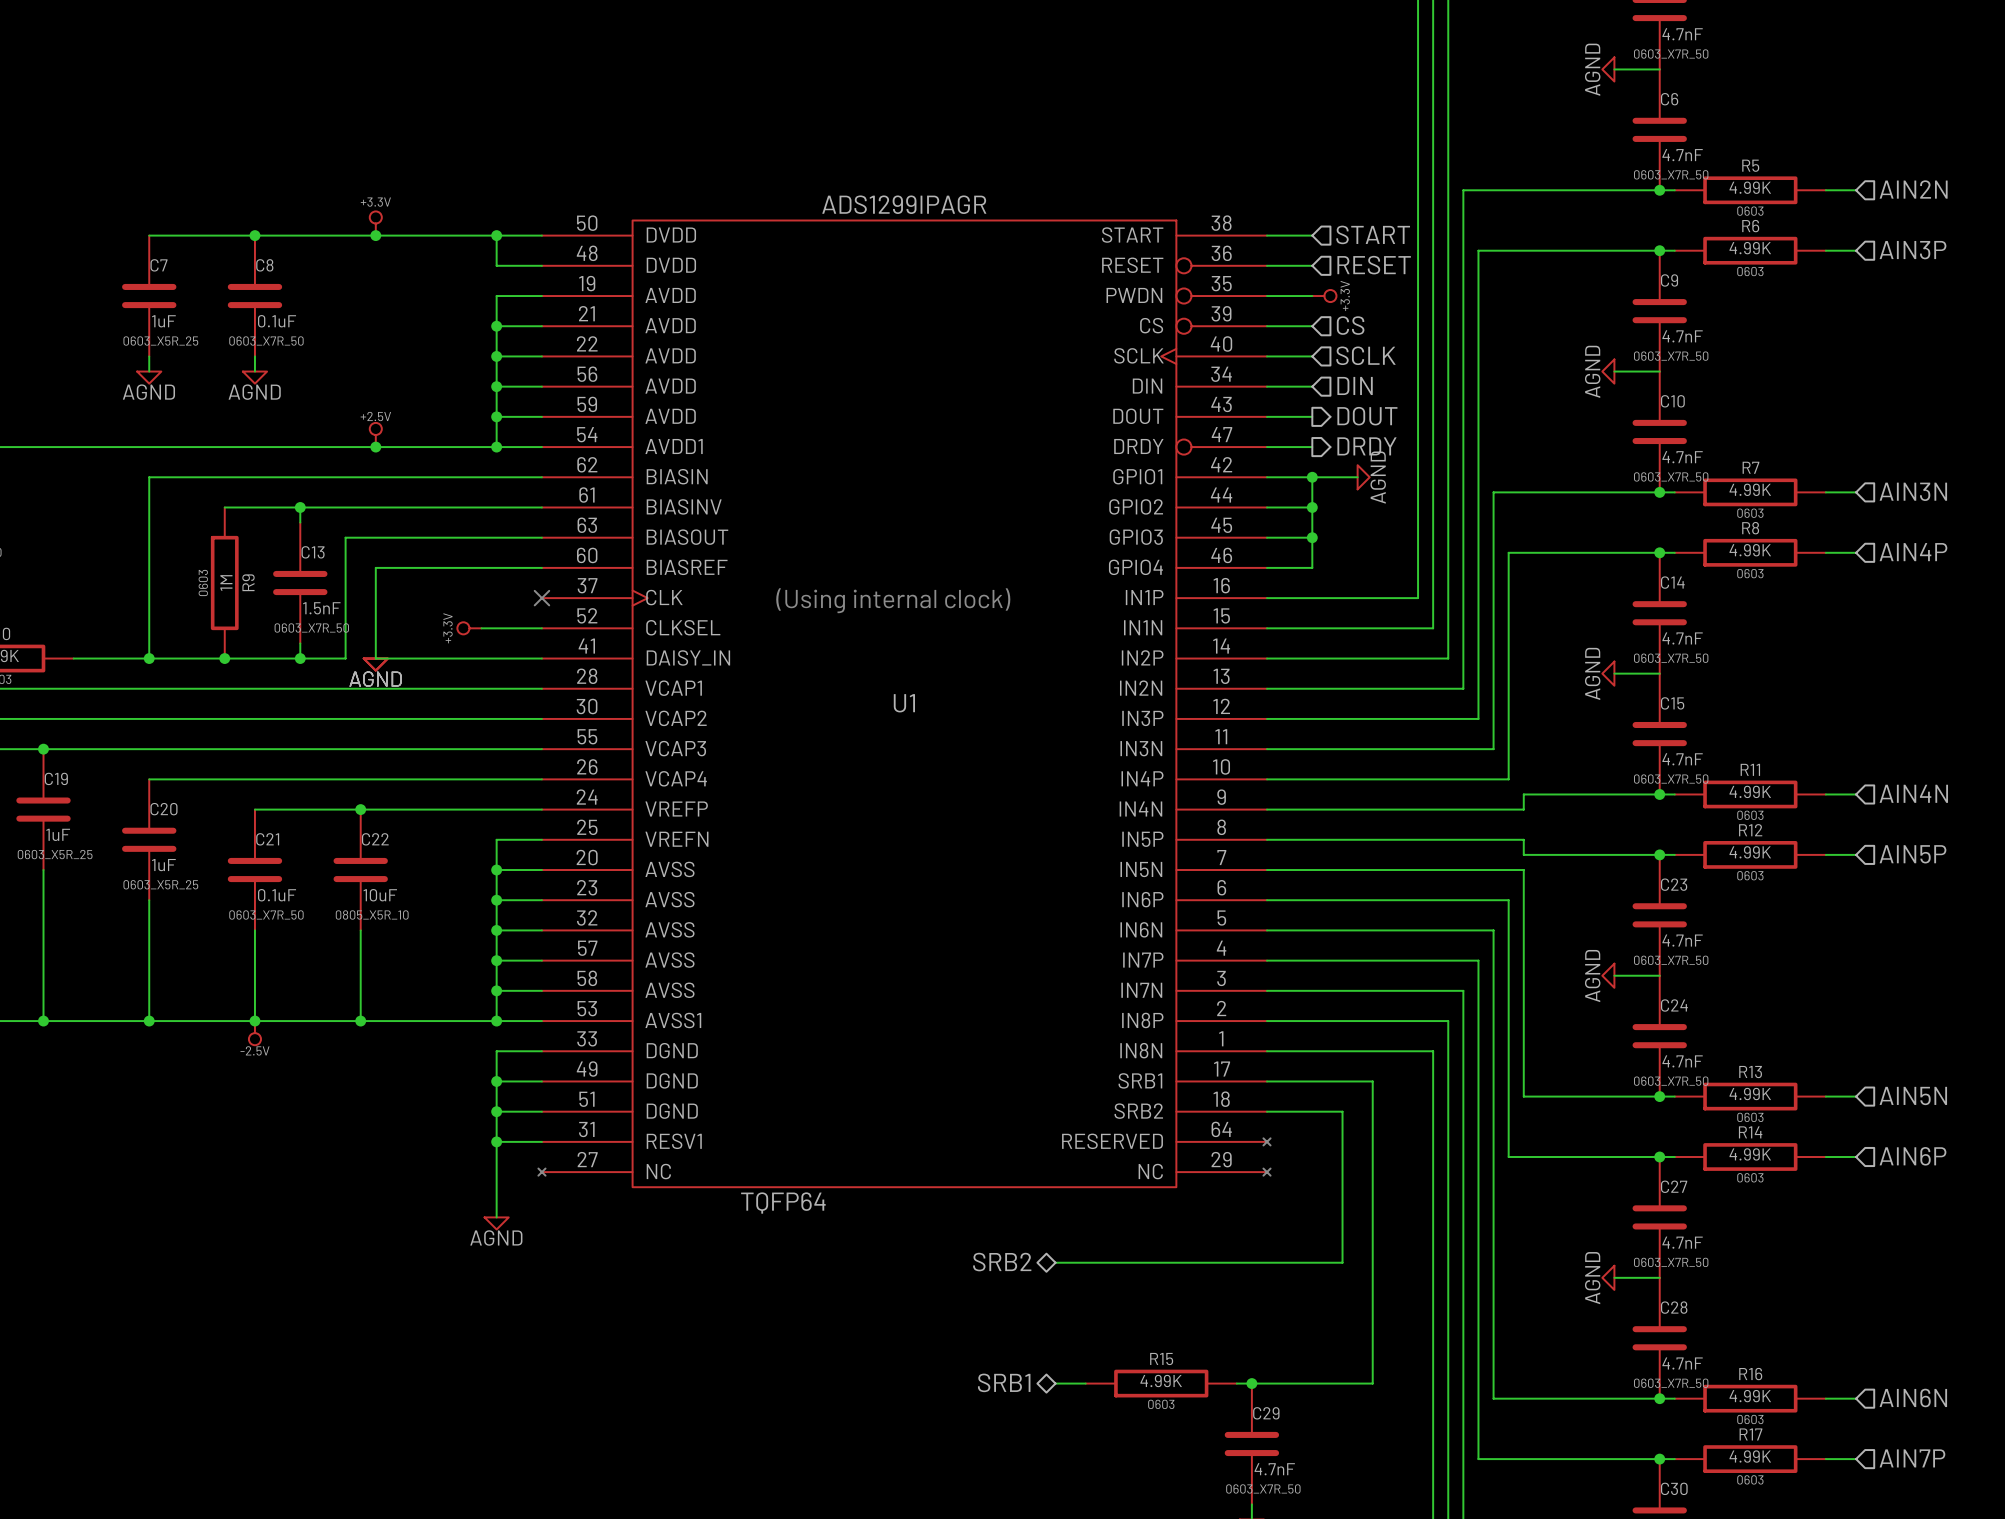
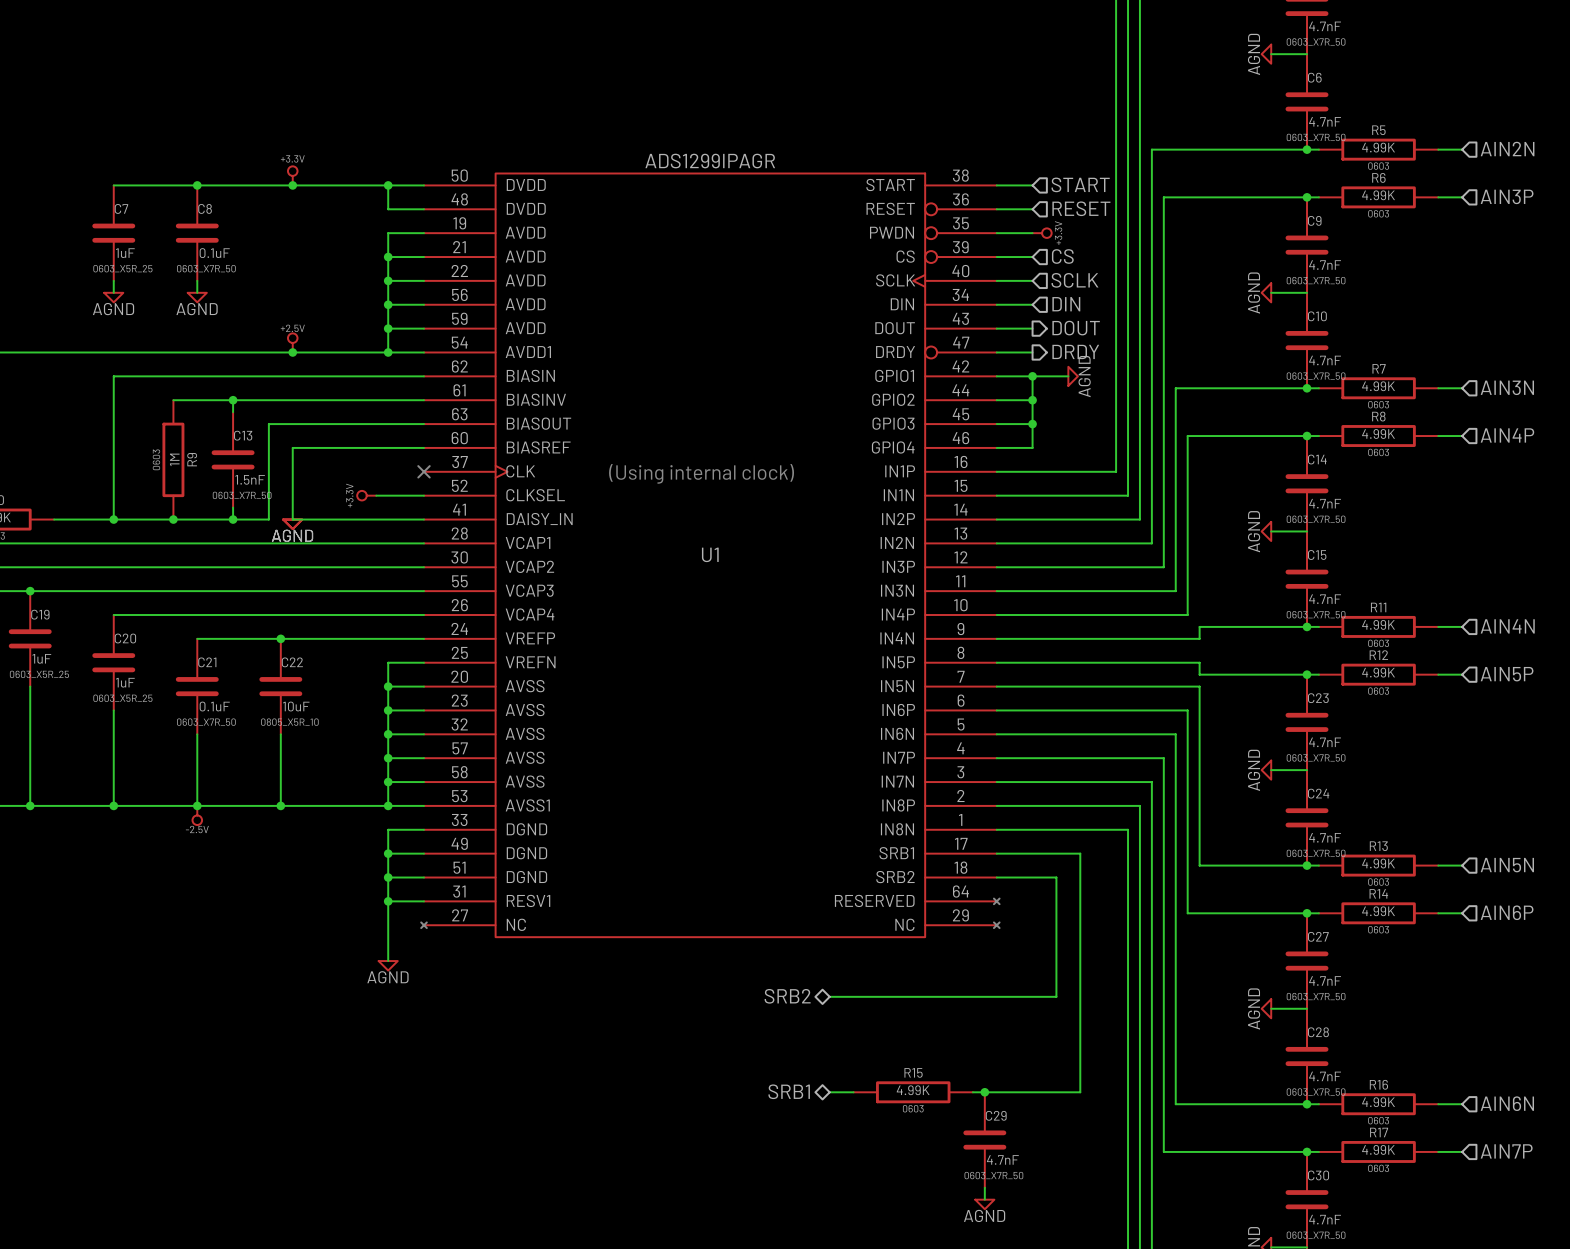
U1 text: TQFP64 (783, 1203) -> none

